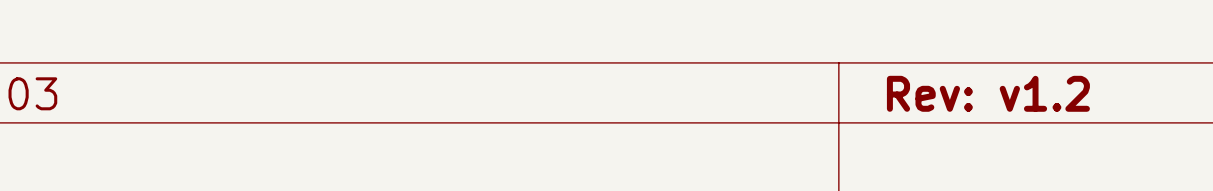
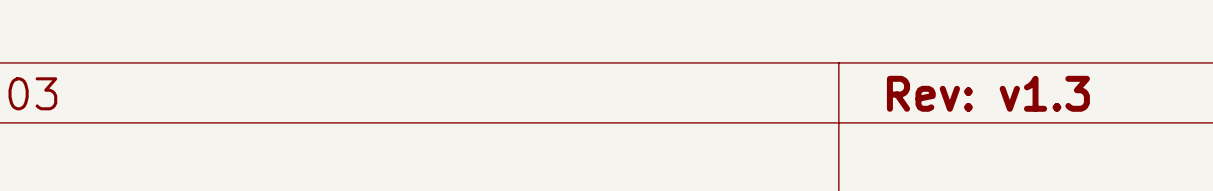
title block: Rev: v1.2 (988, 93) -> Rev: v1.3 (988, 93)

